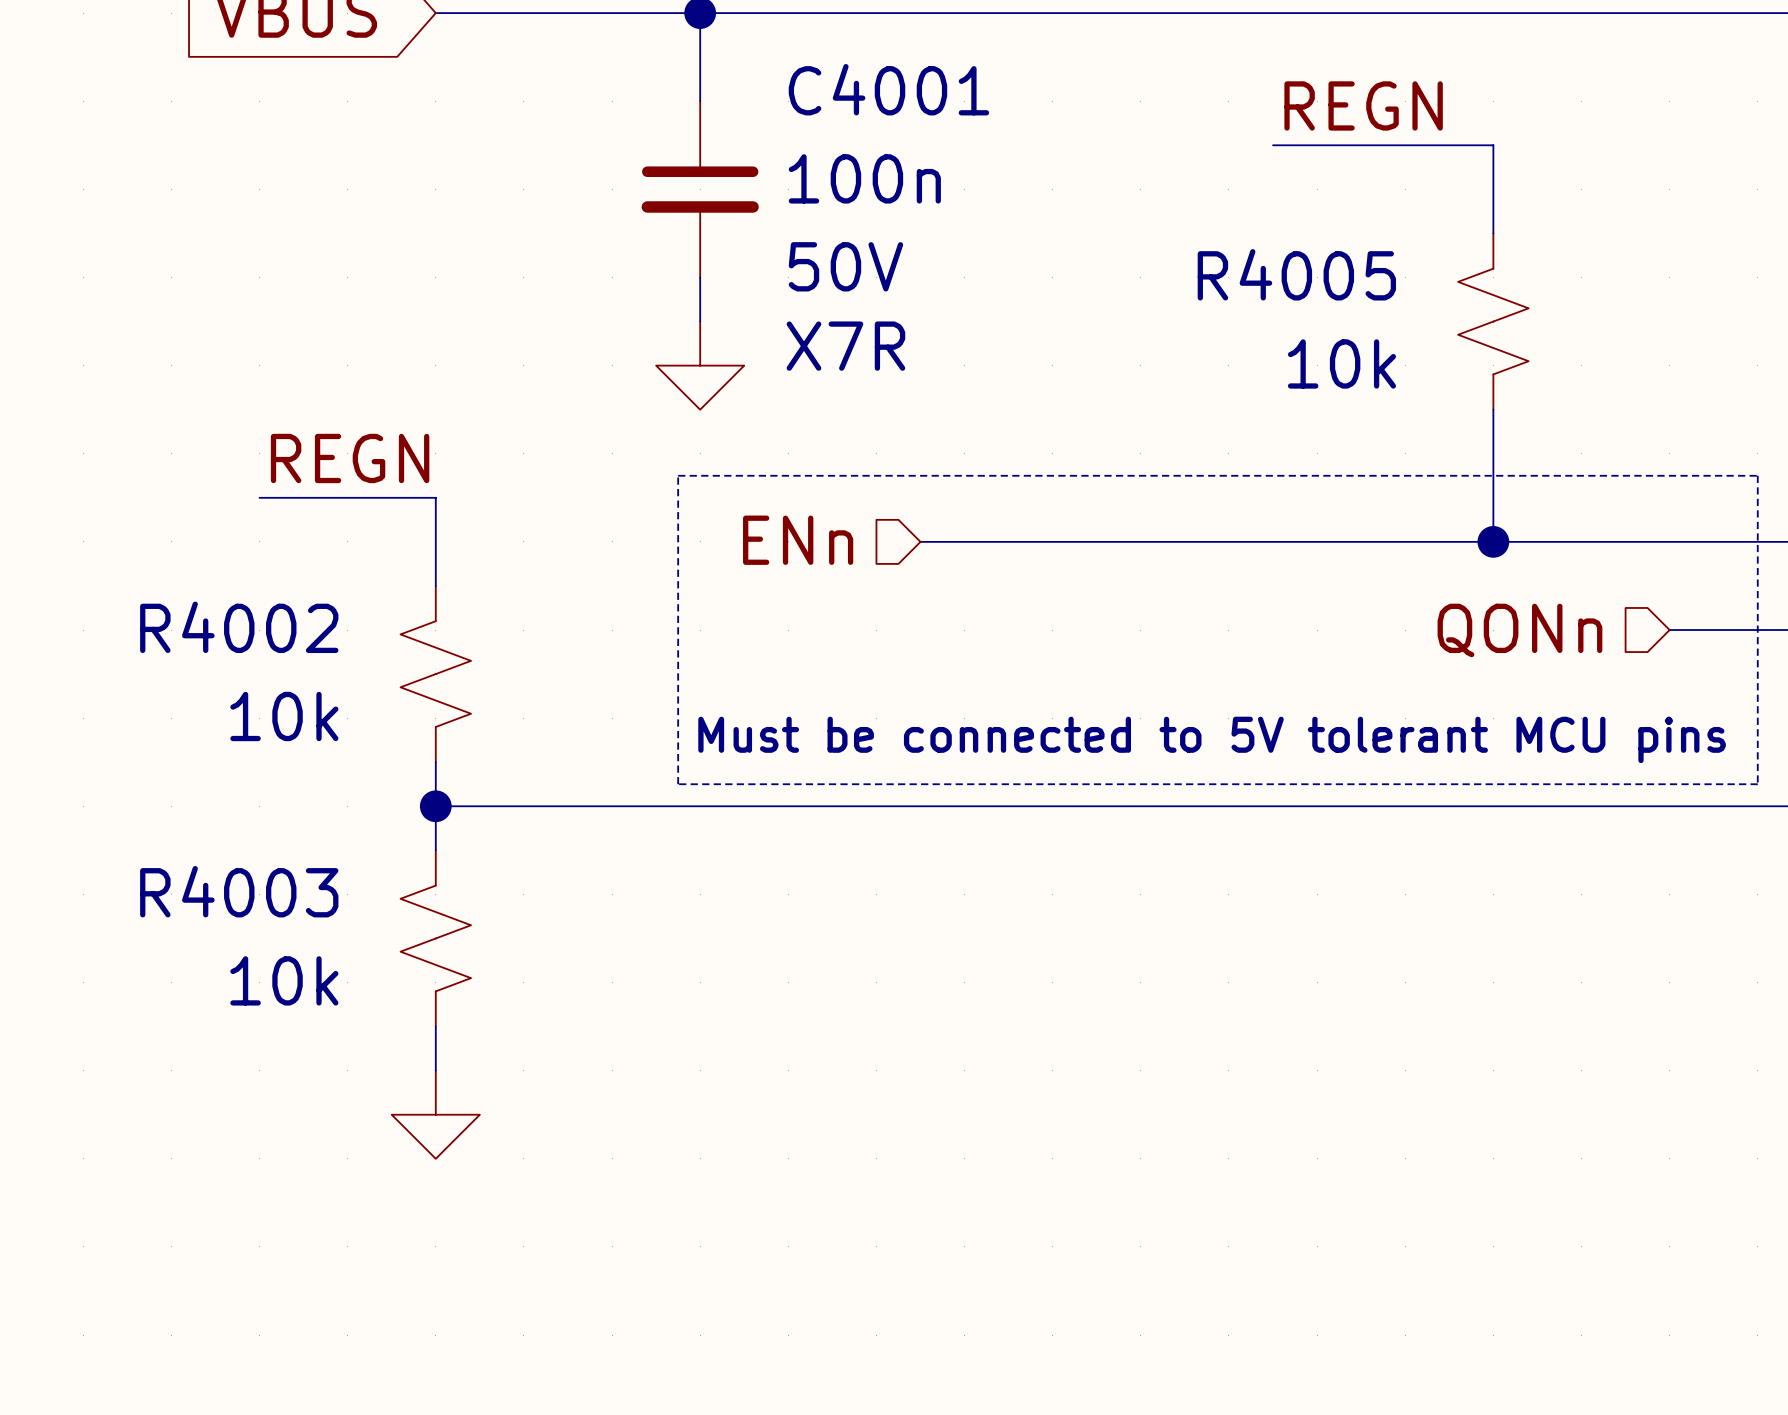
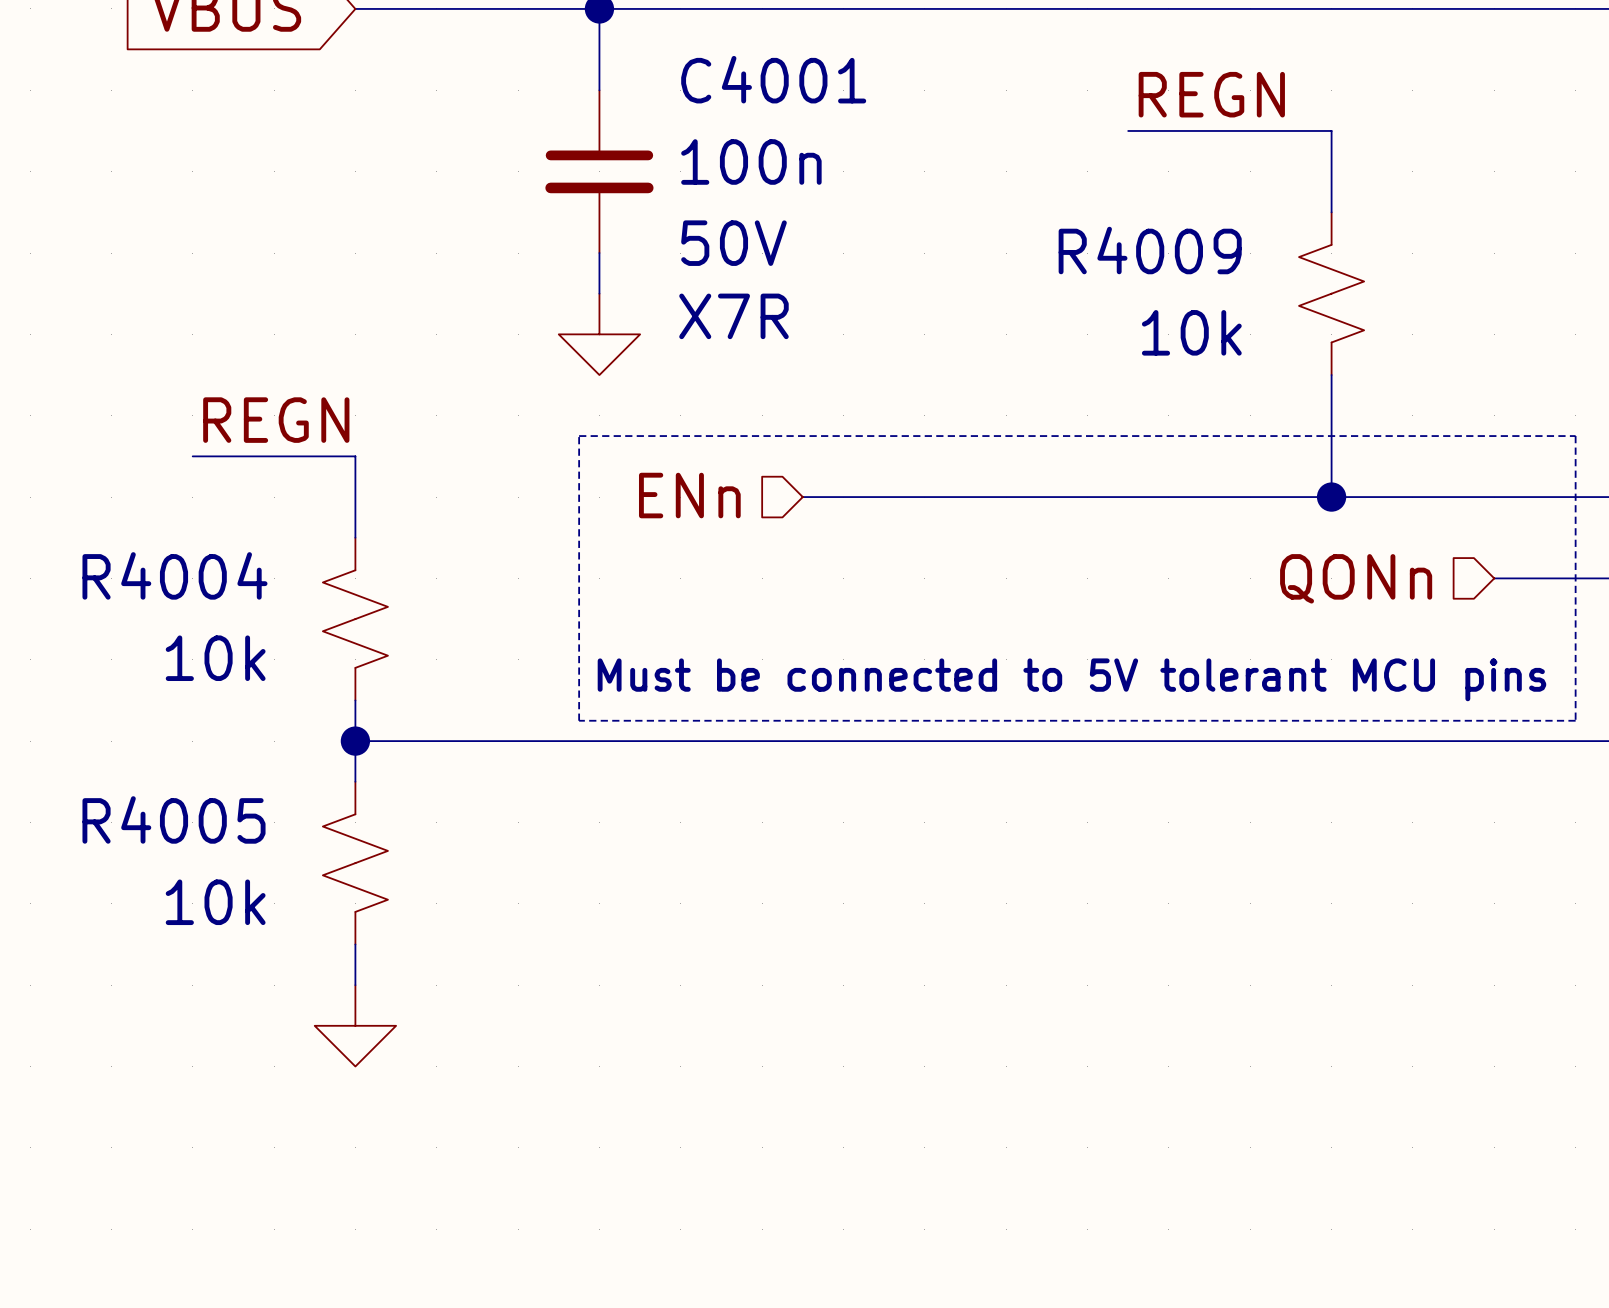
R4005 name: R4005 (1296, 274) -> R4009 (1150, 250)
R4002 name: R4002 (239, 627) -> R4004 (174, 575)
R4003 name: R4003 (239, 891) -> R4005 (174, 819)

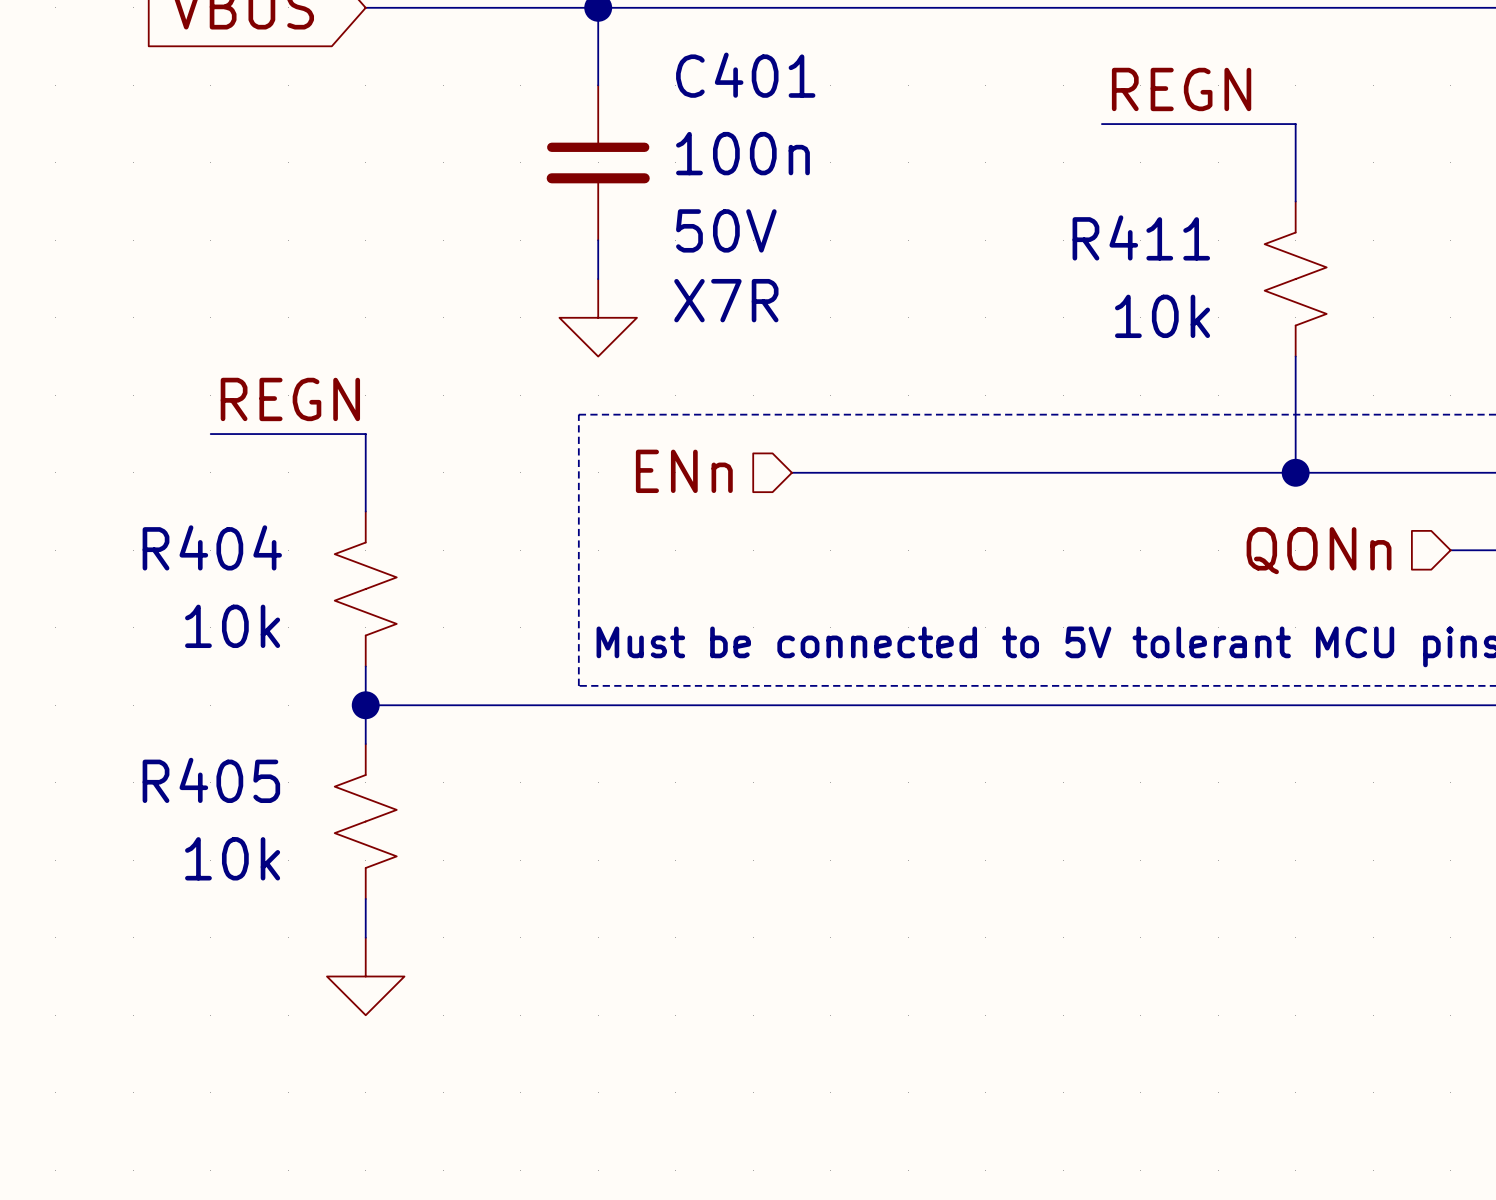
C4001 name: C4001 (773, 79) -> C401 (745, 75)
R4009 name: R4009 (1150, 250) -> R411 (1141, 237)
R4004 name: R4004 (174, 575) -> R404 (212, 547)
R4005 name: R4005 (174, 819) -> R405 (211, 780)

